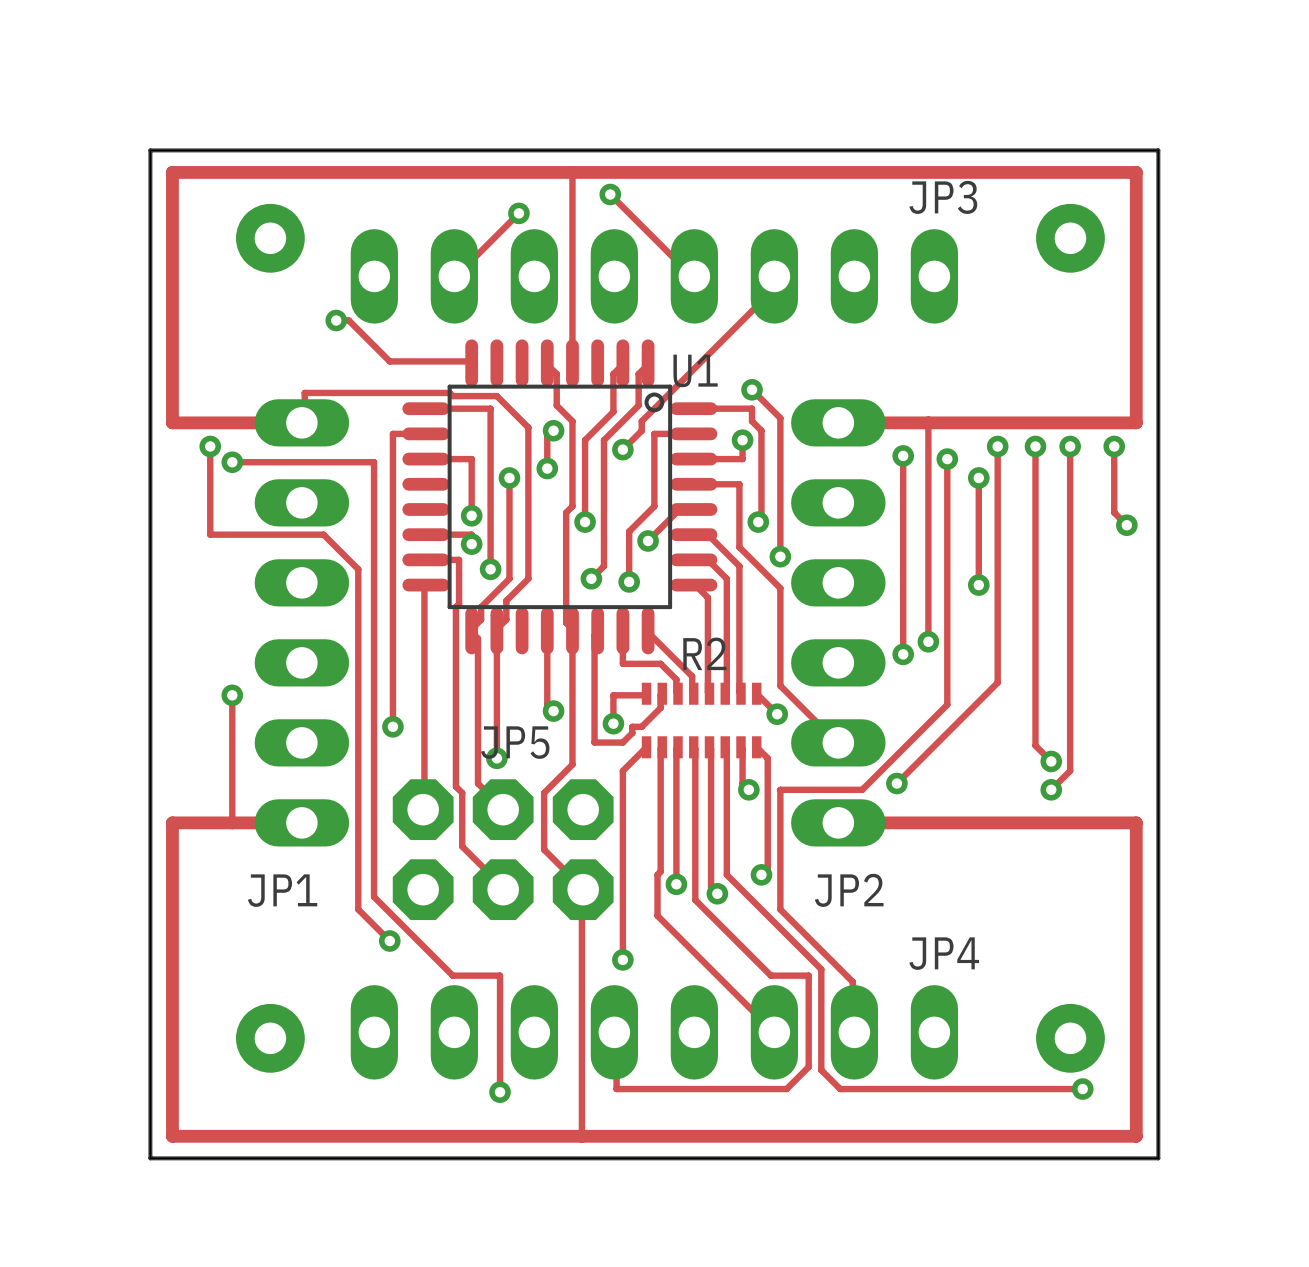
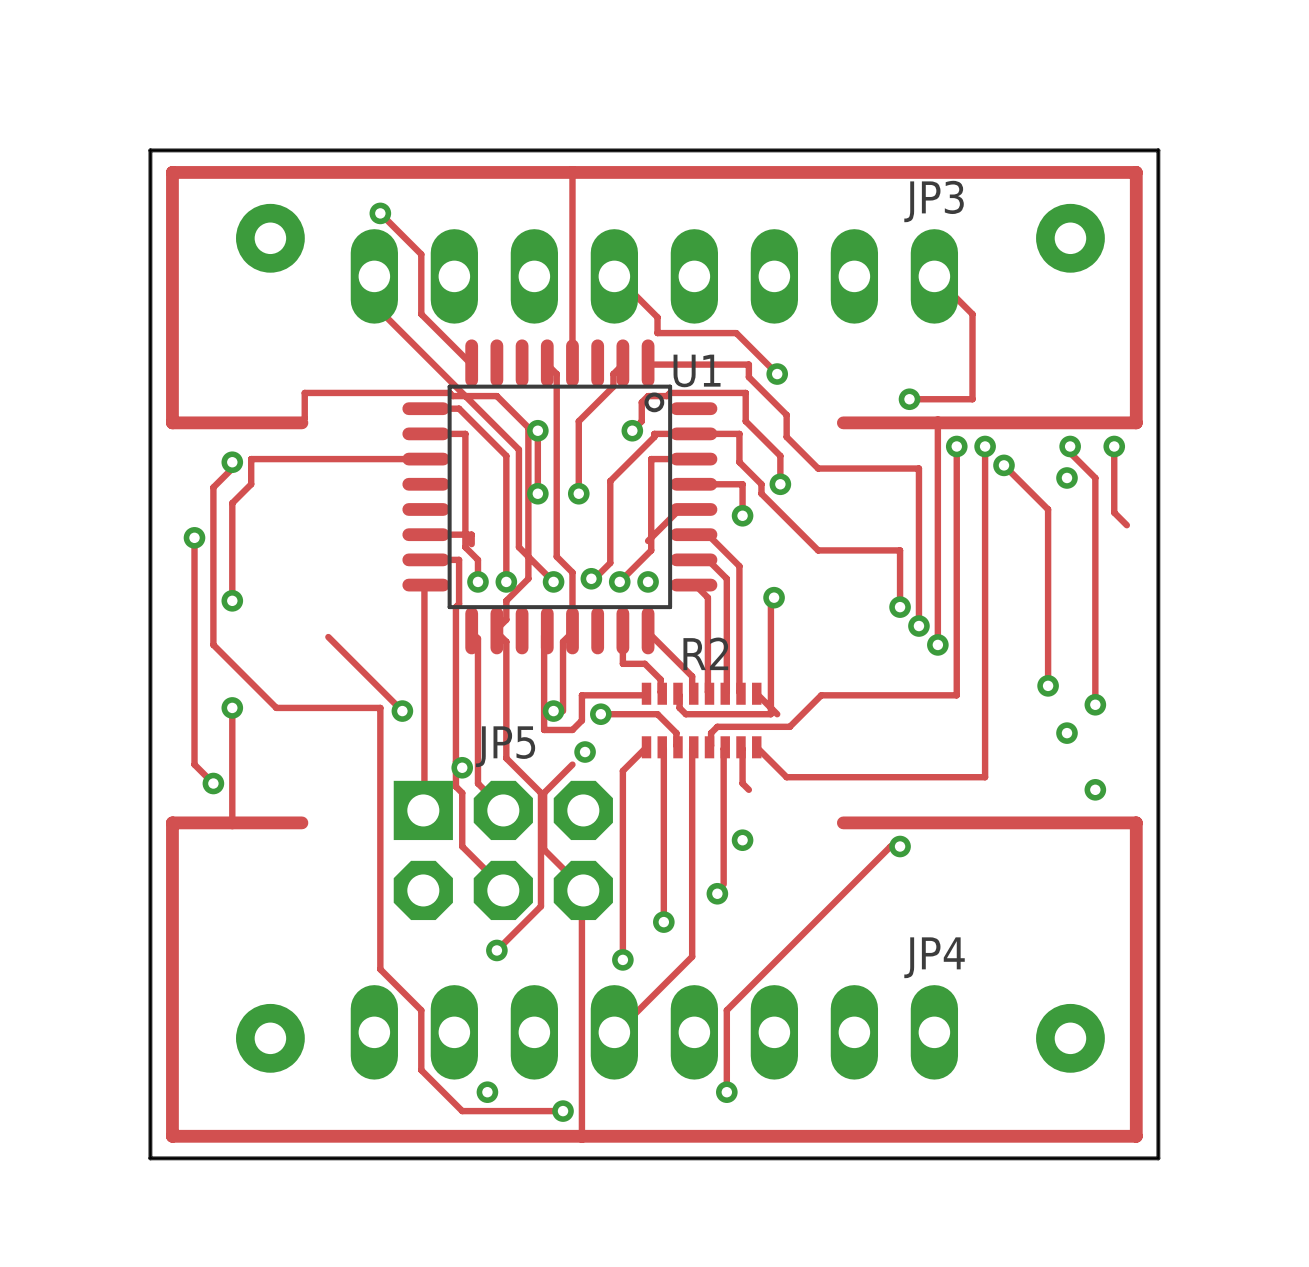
track: (610, 194) (692, 276) (694, 276) -> none
via: (610, 194) -> none
via: none -> (380, 213)
track: (518, 213) (454, 276) -> none
via: (518, 213) -> none
track: none -> (374, 276) (377, 276) (377, 307) (518, 449) (518, 547) (553, 581)
track: none -> (614, 276) (616, 276) (657, 317) (657, 333) (736, 333) (777, 374)
track: (774, 276) (774, 288) (670, 392) -> none
track: none -> (934, 276) (972, 314) (972, 399) (909, 399)
track: (336, 320) (348, 320) (389, 361) (471, 361) (471, 363) -> (380, 213) (421, 254) (421, 314) (471, 364) (471, 363)
via: (336, 320) -> none
track: (648, 364) (638, 374) (638, 405) (603, 440) (603, 566) (591, 578) -> (648, 364) (748, 364) (748, 377) (786, 414) (786, 437) (818, 468) (918, 468) (918, 626)
track: (613, 386) (613, 411) (585, 440) (585, 522) -> (613, 386) (578, 421) (578, 493)
track: (752, 389) (780, 418) (780, 455) -> (670, 392) (745, 392) (745, 421) (780, 455)
via position: (752, 389) -> (777, 374)
track: (666, 396) (641, 421) (641, 430) (622, 449) -> (666, 396) (648, 396) (641, 402) (641, 421) (632, 430)
via: none -> (909, 399)
track: (556, 405) (572, 421) (572, 506) (566, 512) (566, 622) (572, 629) -> (556, 405) (556, 556) (572, 572) (572, 629)
track: (459, 408) (490, 408) (490, 569) -> (459, 408) (506, 455) (506, 581)
track: (693, 408) (752, 408) (752, 421) (761, 430) (761, 484) -> (693, 433) (739, 433) (739, 462) (761, 484)
track: (928, 422) (928, 641) -> none
track: none -> (937, 422) (937, 644)
track: none -> (537, 430) (537, 493)
track: (553, 430) (547, 437) (547, 468) -> none
via position: (553, 430) -> (537, 430)
track: (426, 433) (392, 433) (392, 726) -> (426, 433) (465, 433) (465, 547) (477, 559) (477, 581)
track: (654, 437) (654, 506) (629, 531) (629, 581) -> (654, 437) (610, 481) (610, 563) (591, 581)
track: (742, 440) (742, 459) (693, 459) -> (619, 581) (651, 550) (651, 459) (693, 459)
via: (742, 440) -> none
track: (210, 446) (210, 534) (323, 534) (358, 569) (358, 909) (389, 941) -> none
via: (210, 446) -> none
via: none -> (985, 446)
track: (997, 446) (997, 682) (896, 783) -> none
via: (997, 446) -> none
track: (1035, 446) (1035, 745) (1051, 761) -> none
via: (1035, 446) -> none
track: (1070, 446) (1070, 770) (1051, 789) -> none
via position: (622, 449) -> (632, 430)
track: none -> (1066, 449) (1095, 477) (1095, 704)
track: (903, 455) (903, 654) -> none
via: (903, 455) -> none
track: (426, 459) (471, 459) (471, 515) -> (426, 459) (251, 459) (251, 484) (232, 503) (232, 600)
track: (947, 459) (947, 704) (862, 789) (780, 789) (780, 909) (852, 981) (852, 1032) (854, 1032) -> none
via position: (947, 459) -> (956, 446)
track: (232, 462) (374, 462) (374, 896) (452, 975) (500, 975) (500, 1092) -> none
track: none -> (1004, 465) (1048, 509) (1048, 685)
via: none -> (1004, 465)
track: none -> (232, 468) (213, 487) (213, 644) (276, 707) (380, 707) (380, 969) (421, 1010) (421, 1070) (462, 1111) (563, 1111)
via: (547, 468) -> none
track: (509, 477) (509, 578) (481, 607) (481, 619) (471, 630) -> none
via: (509, 477) -> none
track: (978, 477) (978, 585) -> none
via: (978, 477) -> none
via: none -> (1066, 477)
track: (739, 484) (739, 547) (780, 588) (780, 685) (838, 742) -> (739, 484) (742, 484) (742, 515)
track: (780, 484) (780, 556) -> none
via: none -> (780, 484)
via: none -> (537, 493)
via: none -> (578, 493)
track: (761, 493) (761, 518) (758, 522) -> (761, 493) (818, 550) (900, 550) (900, 607)
via: (471, 515) -> none
via: (585, 522) -> none
via position: (758, 522) -> (742, 515)
via: (1126, 525) -> none
track: none -> (194, 537) (194, 764) (213, 783)
via: none -> (194, 537)
via: (648, 540) -> none
via: (471, 544) -> none
via: (780, 556) -> none
via: (490, 569) -> none
via: none -> (477, 581)
via: none -> (506, 581)
via: none -> (553, 581)
via: none -> (619, 581)
via: (629, 581) -> none
via: none -> (648, 581)
via: (978, 585) -> none
track: none -> (774, 597) (770, 600) (770, 714) (685, 714) (679, 707) (677, 693)
via: none -> (774, 597)
via: none -> (232, 600)
via: none -> (900, 607)
part: (301, 622) -> none
part: (838, 622) -> none
via: none -> (918, 626)
track: (496, 632) (496, 758) -> (496, 632) (506, 641) (506, 758) (540, 792) (540, 906) (496, 950)
track: (547, 632) (547, 704) (553, 711) -> (547, 632) (544, 635) (544, 729) (572, 729) (581, 720) (581, 695) (613, 695)
track: (572, 632) (572, 764) -> (572, 632) (563, 641) (563, 711)
track: (597, 632) (594, 635) (594, 742) (622, 742) (632, 733) (632, 726) (641, 726) (660, 707) (662, 693) -> none
track: none -> (328, 637) (402, 711)
via: (928, 641) -> none
via: none -> (937, 644)
via: (903, 654) -> none
track: (644, 663) (660, 663) (676, 679) (677, 693) -> (644, 663) (660, 679) (662, 693)
via: none -> (1048, 685)
via position: (232, 695) -> (232, 707)
track: (613, 695) (613, 723) -> none
via: none -> (1095, 704)
via: (777, 714) -> none
via position: (613, 723) -> (600, 714)
via position: (392, 726) -> (402, 711)
via: none -> (1066, 733)
track: (662, 747) (660, 748) (660, 871) (657, 874) (657, 915) (774, 1032) -> (662, 747) (663, 748) (663, 922)
track: (677, 747) (676, 748) (676, 884) -> (677, 747) (676, 733) (657, 714) (600, 714)
track: (693, 747) (695, 748) (695, 900) (770, 975) (808, 975) (808, 1066) (786, 1089) (616, 1089) (616, 1032) -> (693, 747) (692, 748) (692, 956) (616, 1032)
track: (709, 747) (711, 748) (711, 887) (717, 893) -> (709, 747) (711, 733) (717, 726) (789, 726) (821, 695) (956, 695) (956, 446)
track: (725, 747) (726, 748) (726, 874) (821, 969) (821, 1070) (840, 1089) (1082, 1089) -> (725, 747) (723, 748) (723, 884)
via: none -> (585, 752)
via position: (496, 758) -> (462, 767)
track: (767, 758) (767, 868) (761, 874) -> (767, 758) (786, 777) (985, 777) (985, 446)
via: (1051, 761) -> none
part footprint: [392, 779, 614, 921] -> [393, 780, 613, 921]
via: none -> (213, 783)
via position: (896, 783) -> (900, 846)
via: (748, 789) -> none
via: (1051, 789) -> none
via: none -> (1095, 789)
via: none -> (742, 840)
track: none -> (900, 846) (890, 846) (726, 1010) (726, 1092)
via: (761, 874) -> none
via: (676, 884) -> none
text: JP1 (282, 890) -> none
text: JP2 (849, 890) -> none
via: none -> (663, 922)
via: (389, 941) -> none
via: none -> (496, 950)
via: (1082, 1089) -> none
via position: (500, 1092) -> (487, 1092)
via: none -> (726, 1092)
via: none -> (563, 1111)

